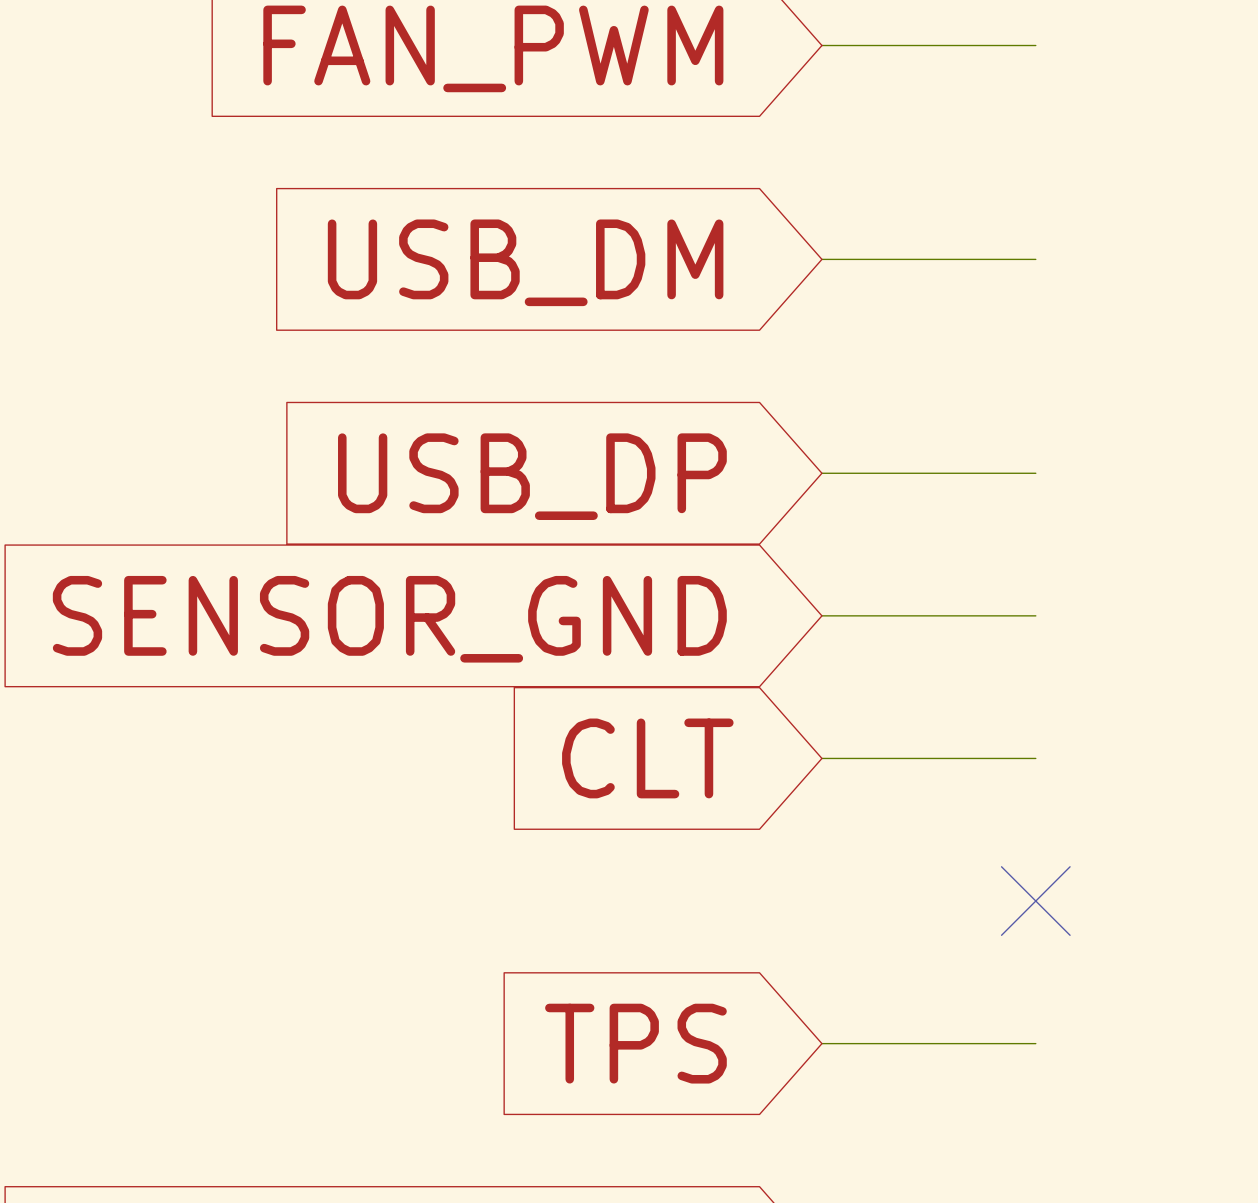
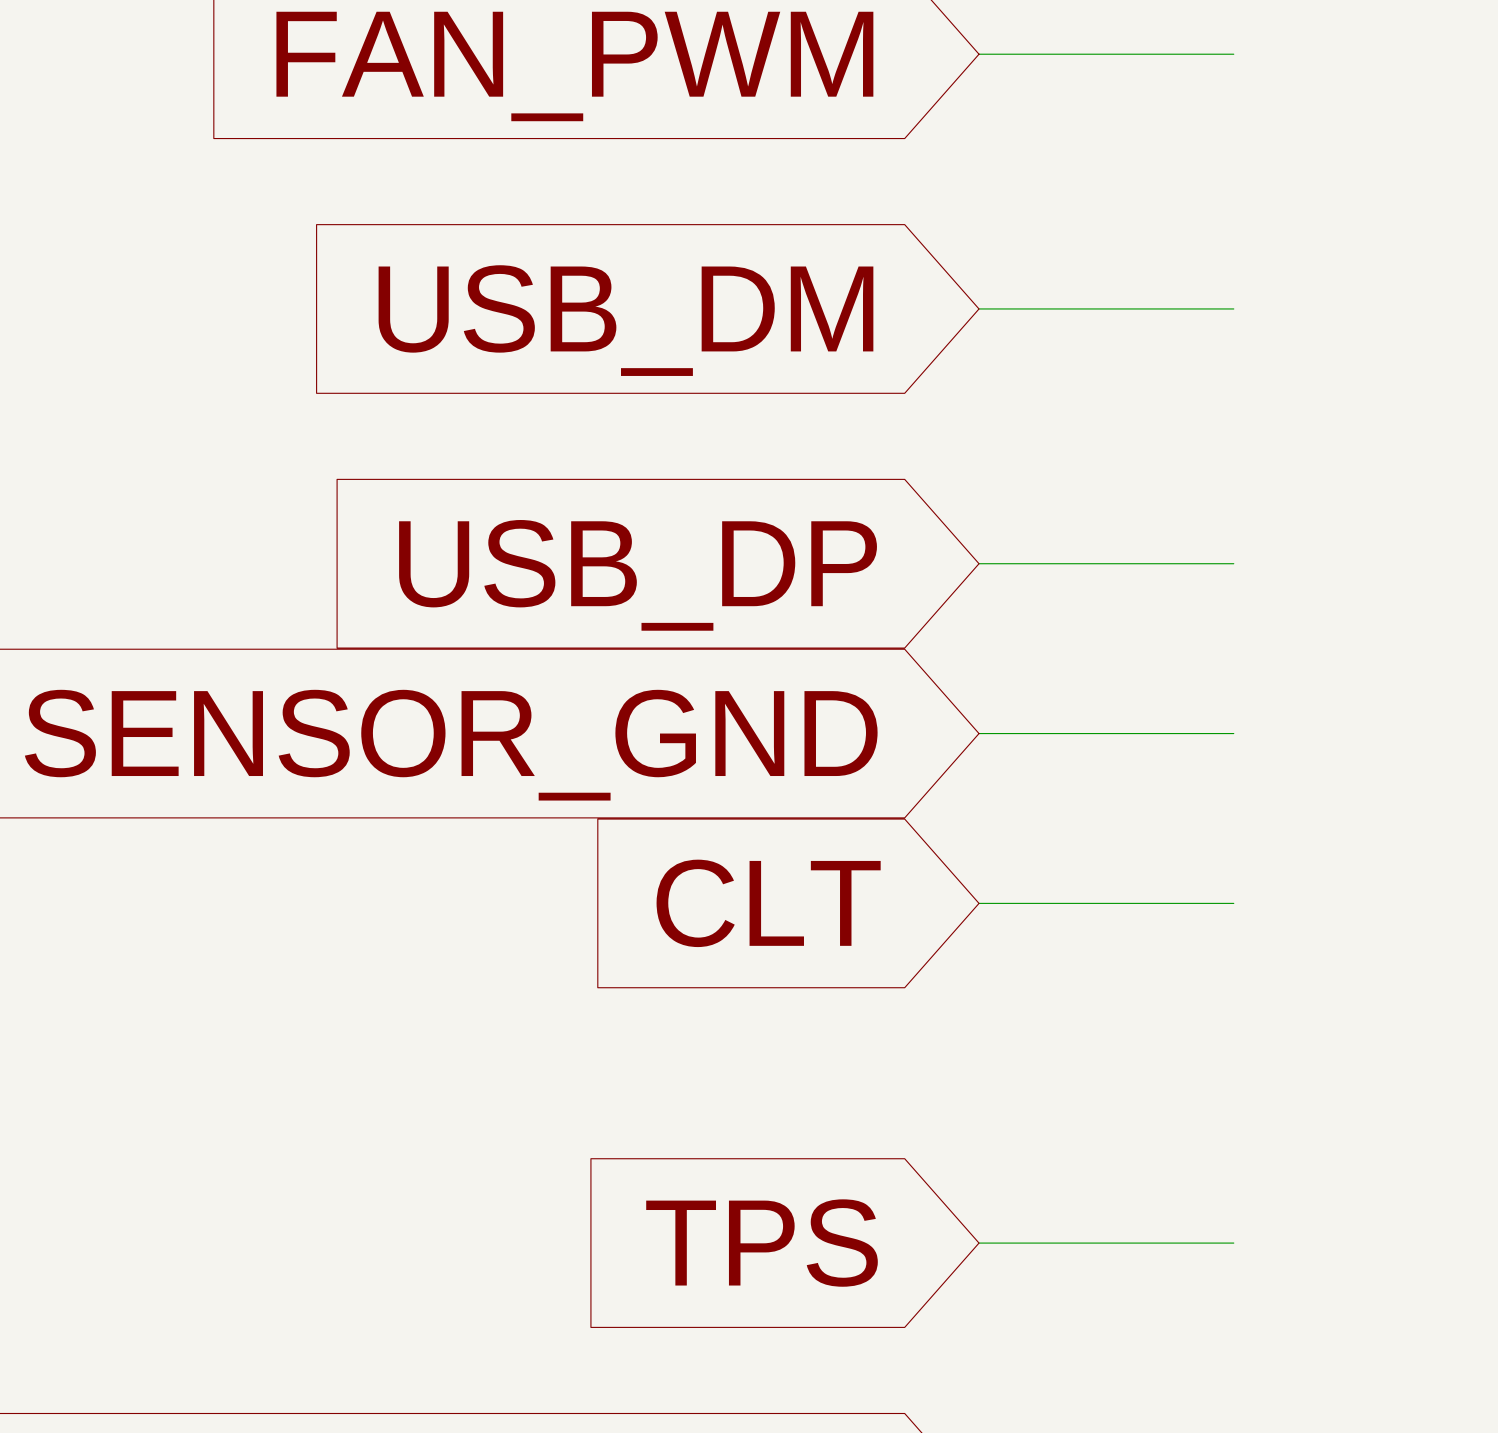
no-connect mark: (1035, 901) -> none

